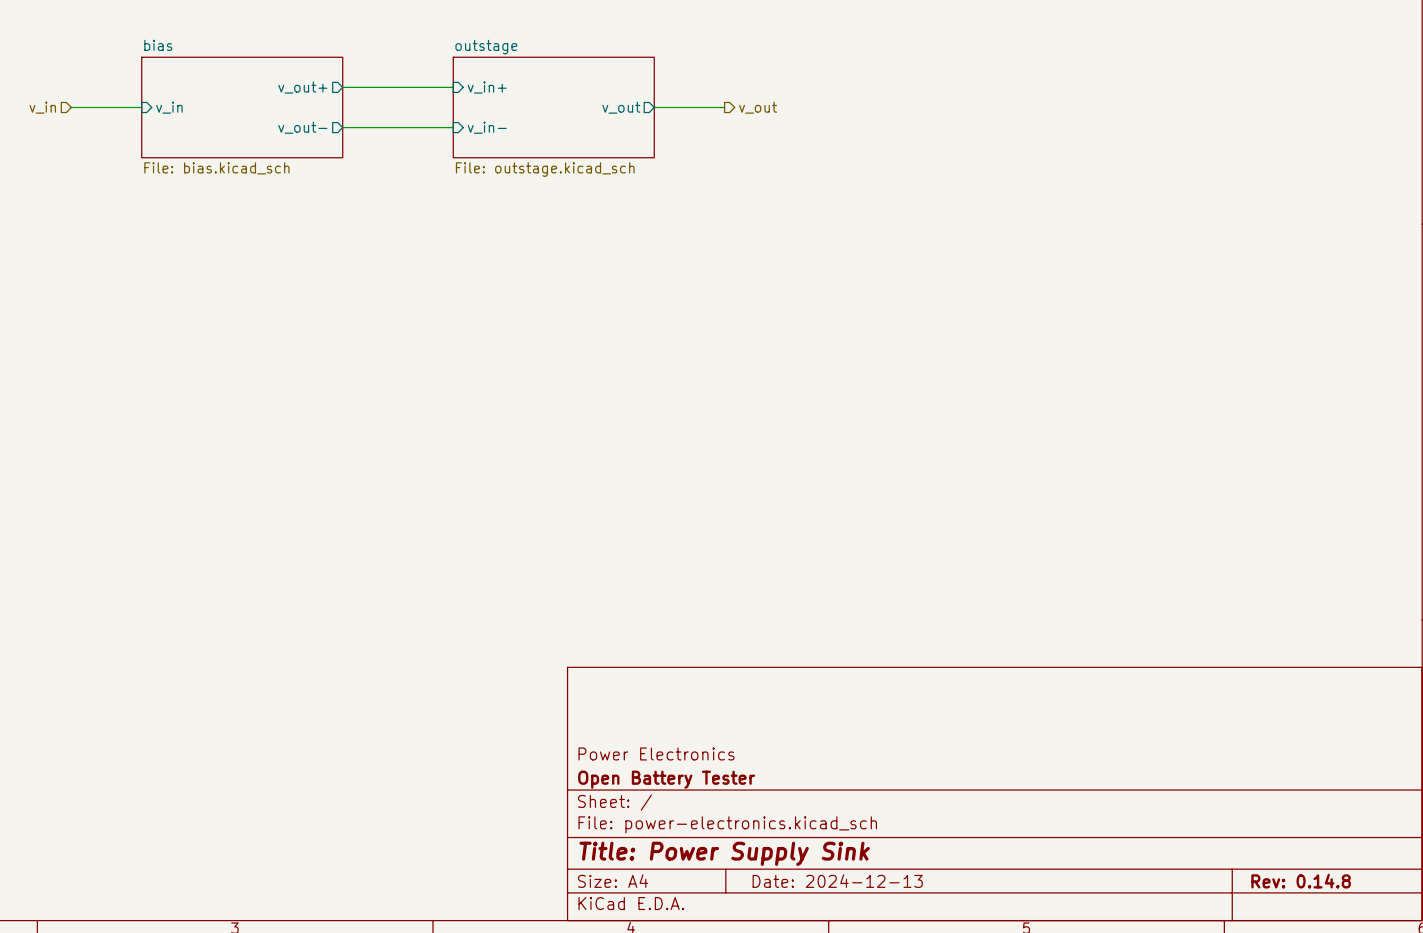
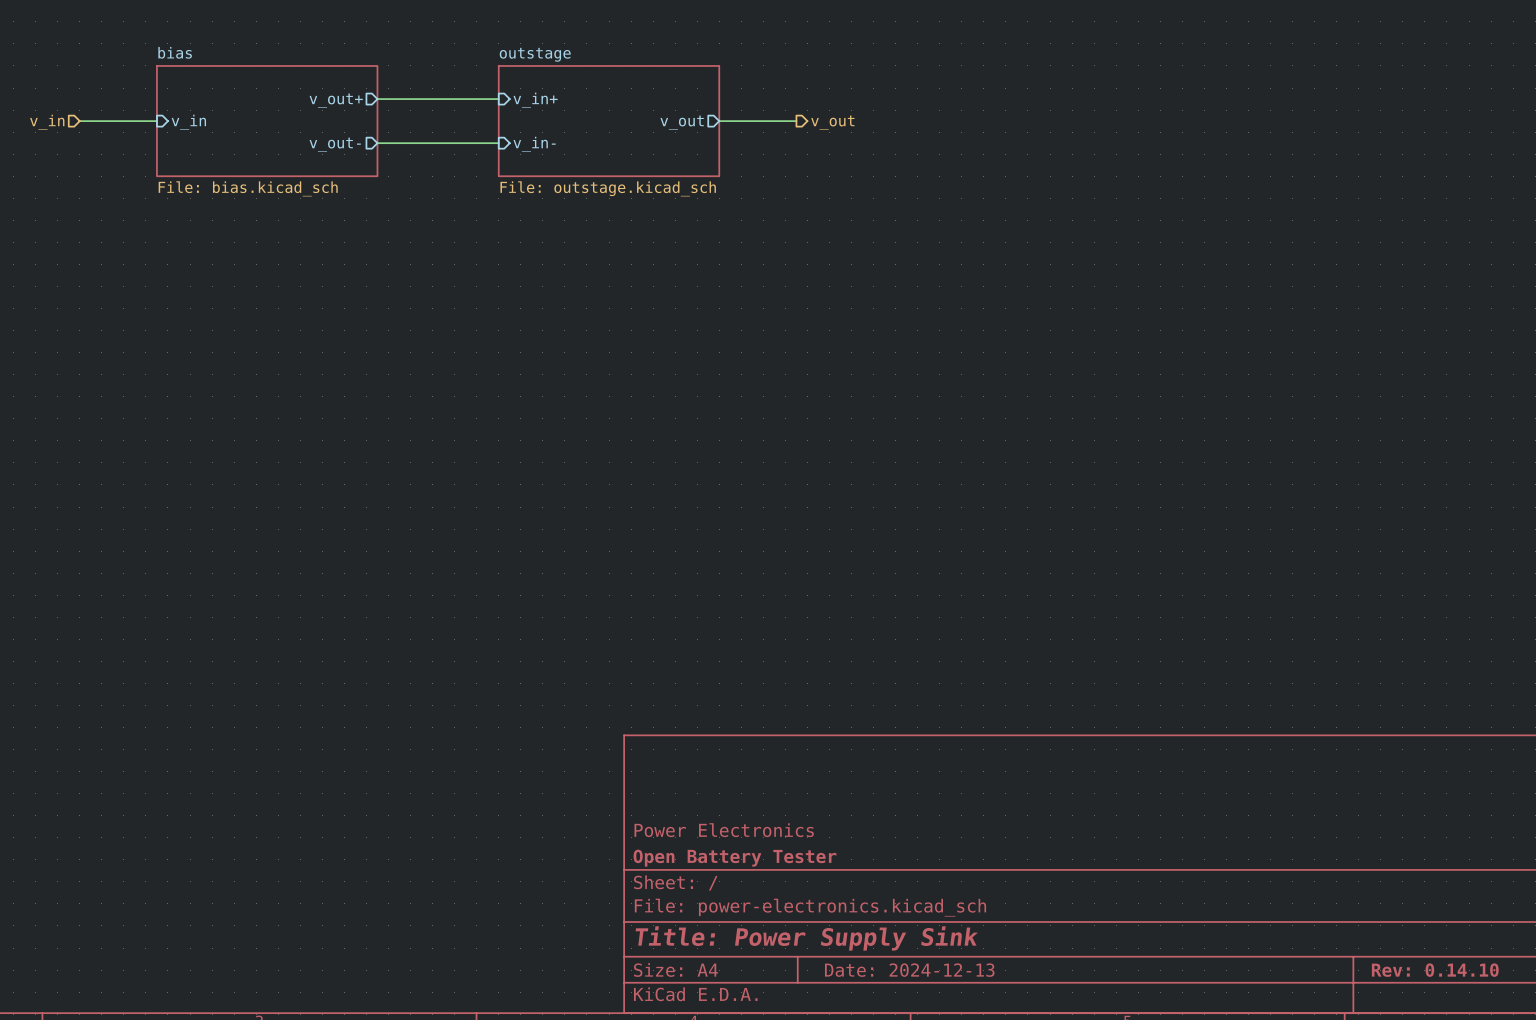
title block: Rev: 0.14.8 (1301, 881) -> Rev: 0.14.10 (1435, 970)

